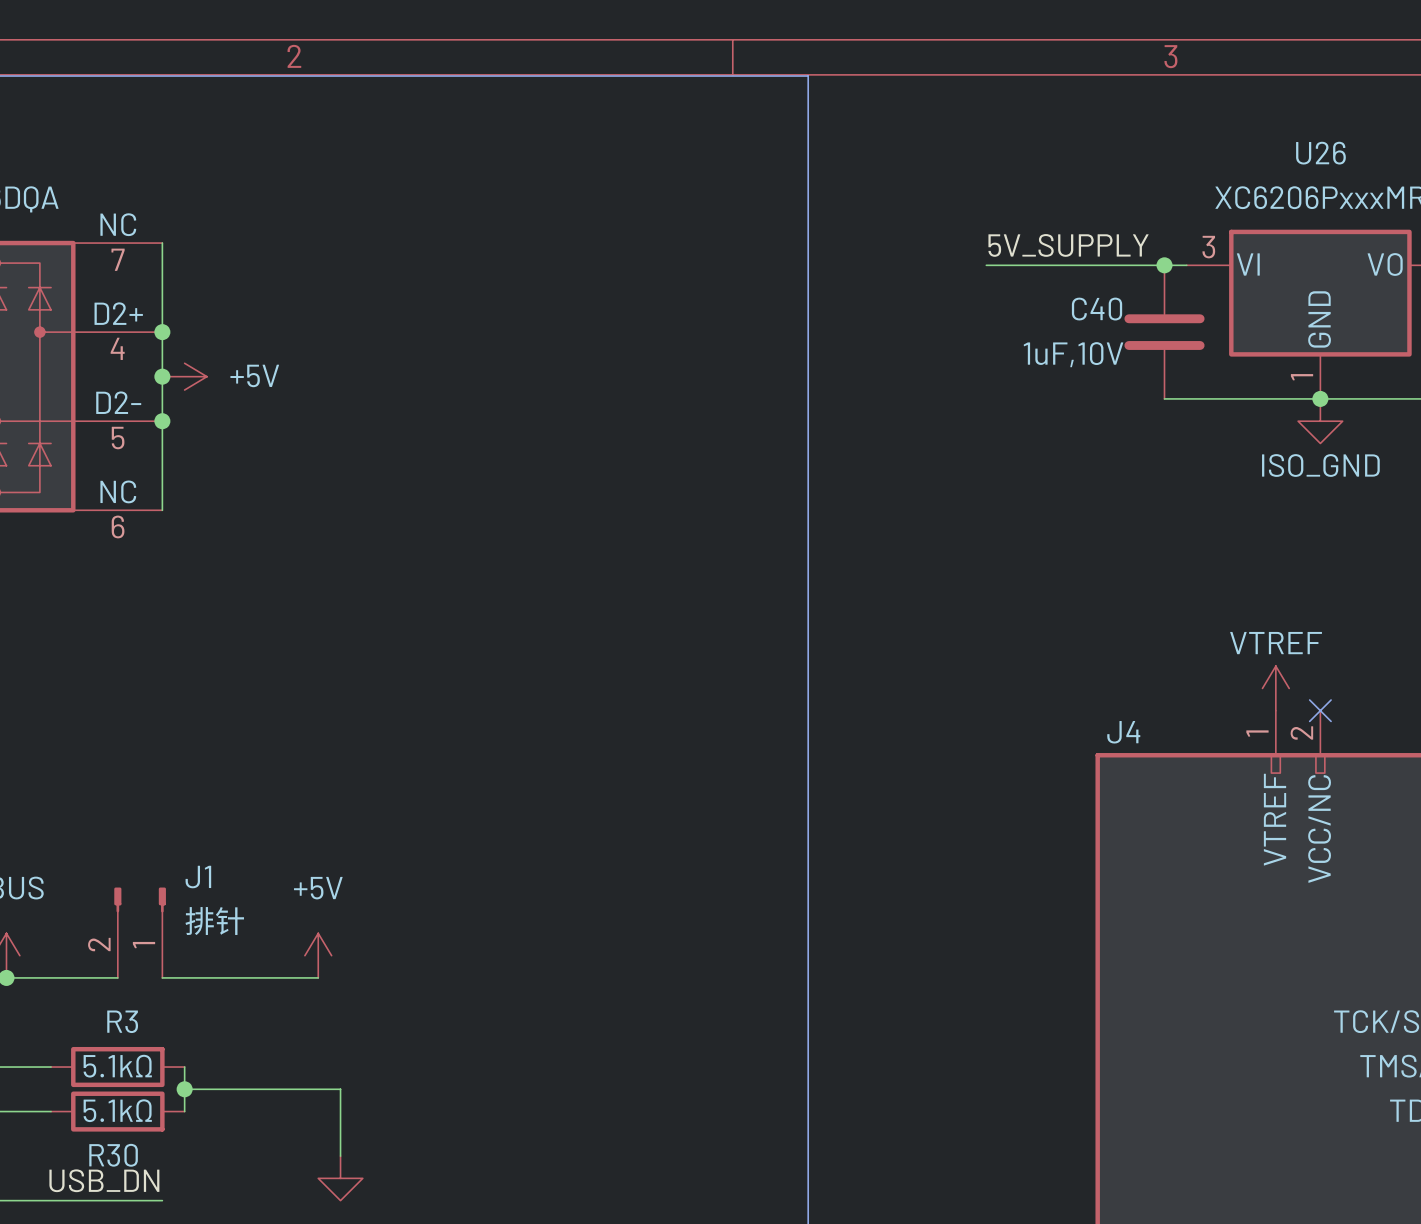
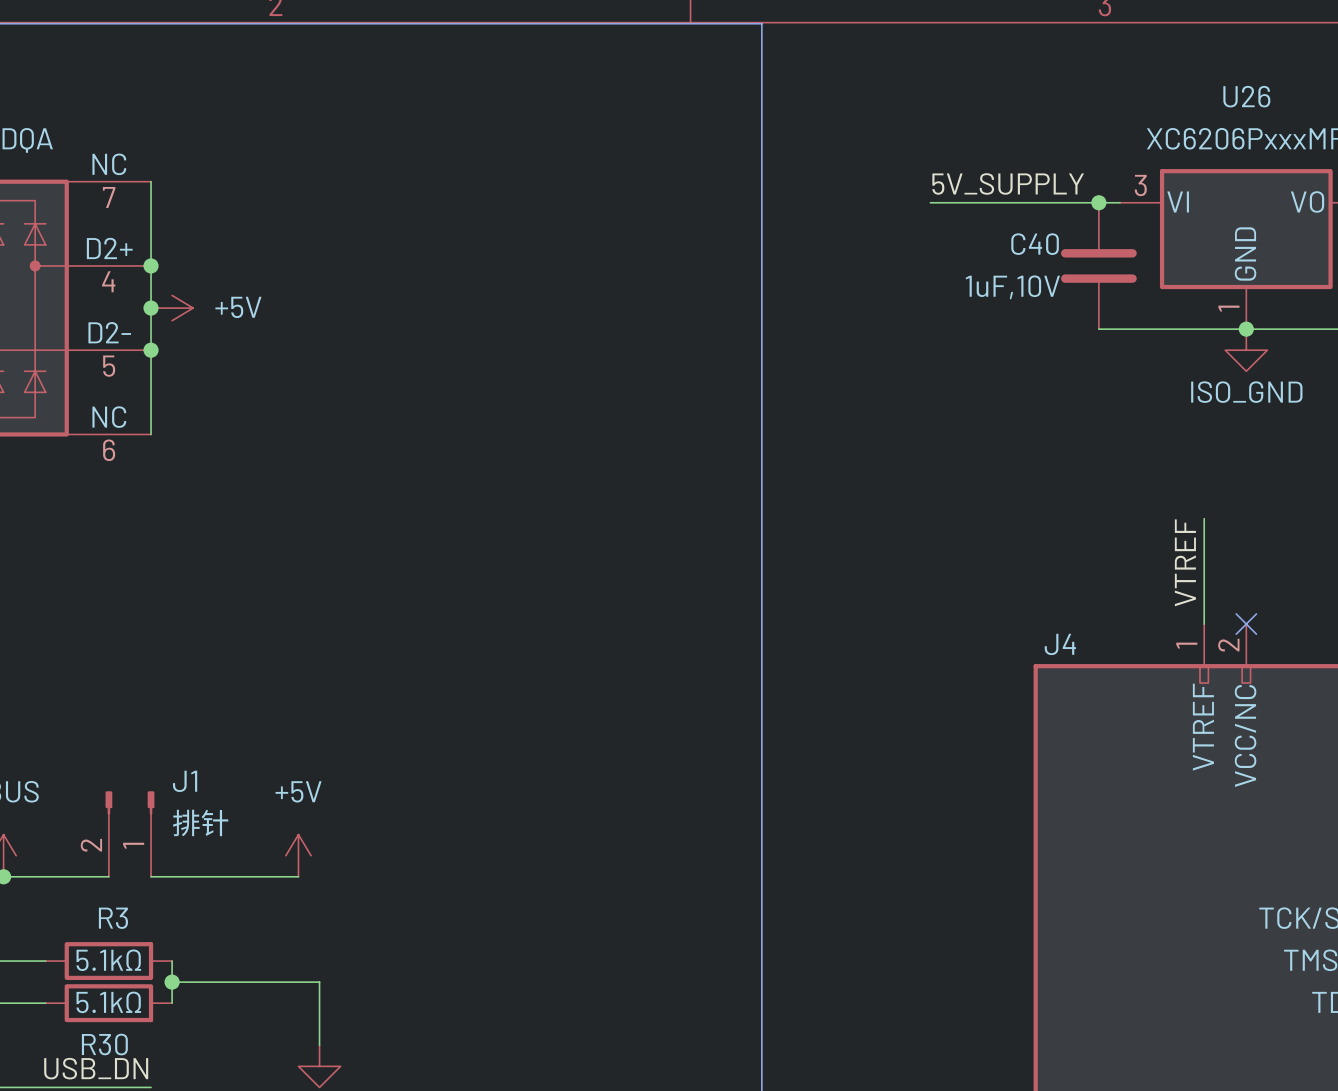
wire: none -> (1204, 518) (1204, 624)
label: none -> VTREF (1185, 562)
power symbol: VTREF (1275, 688) -> none

